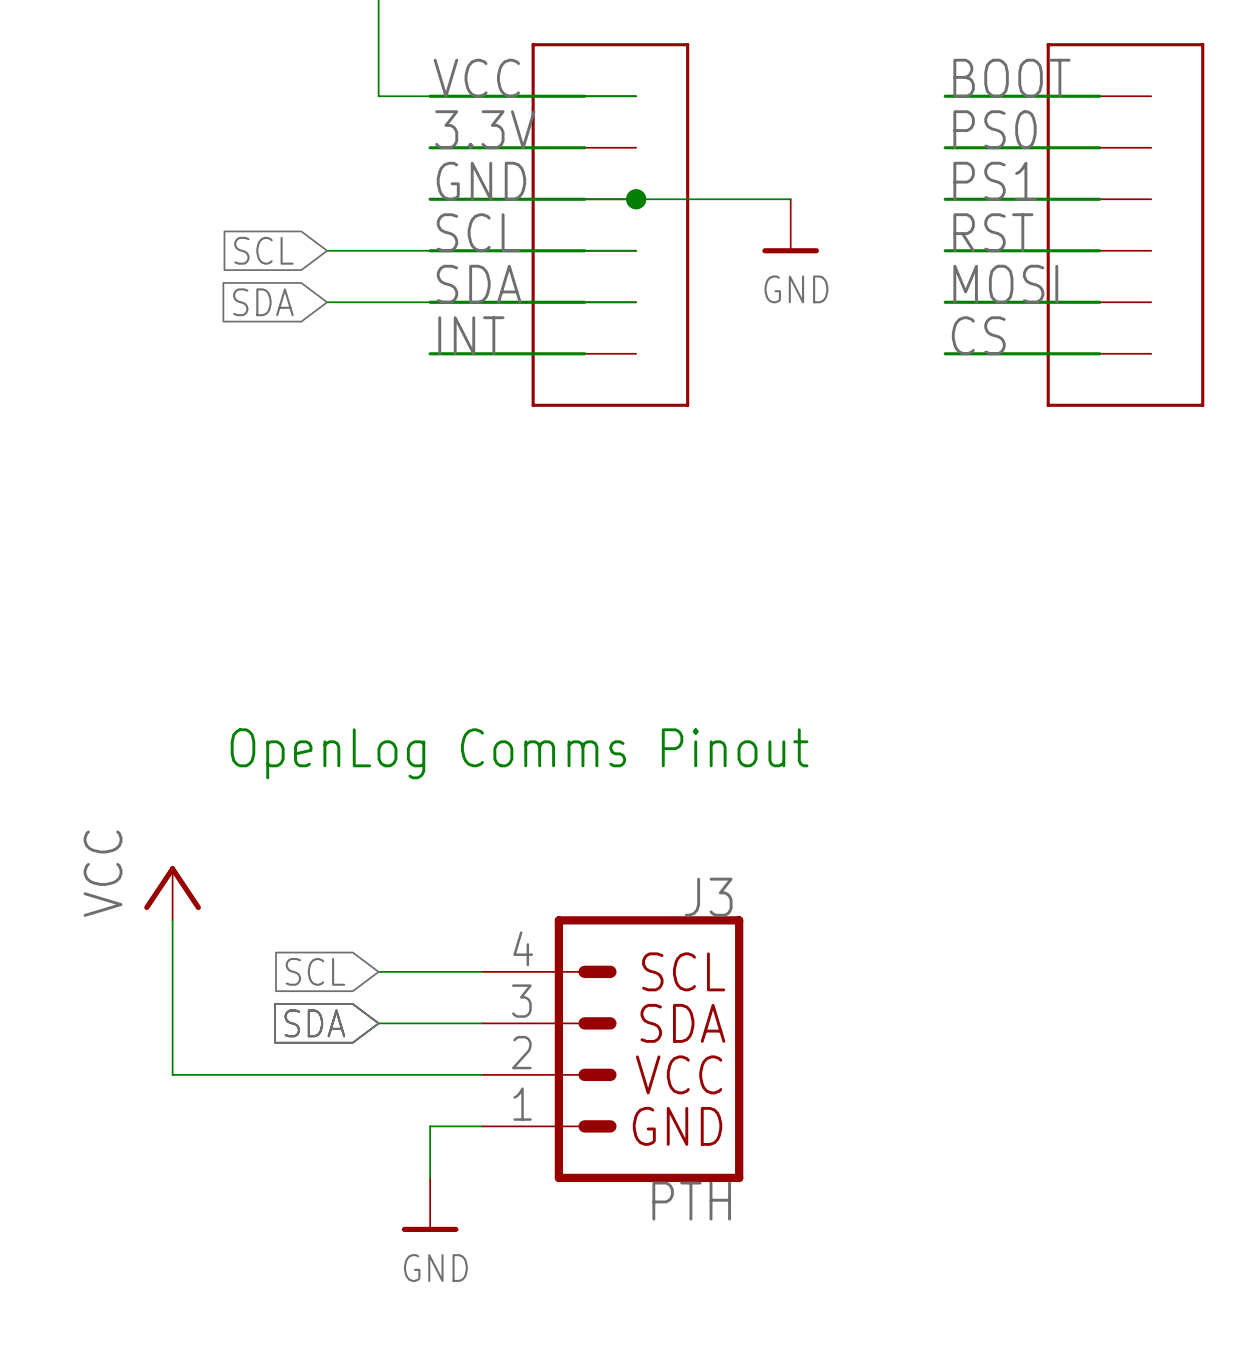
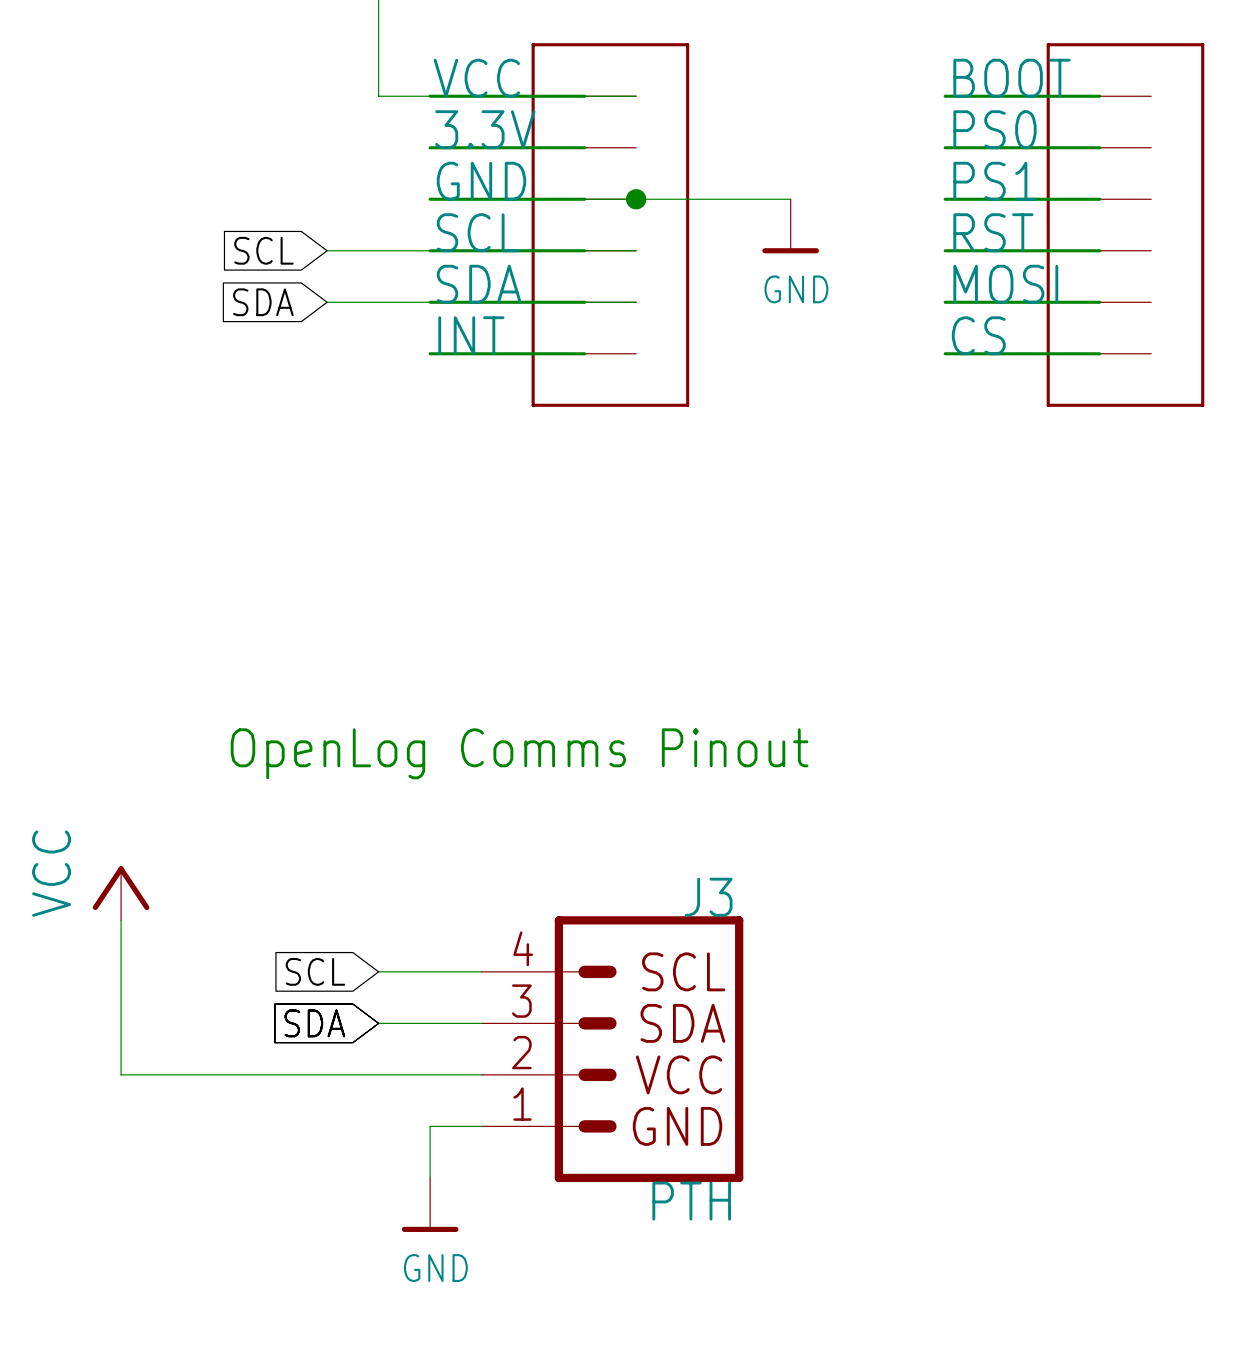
power symbol position: VCC (172, 893) -> VCC (121, 893)
wire: (172, 920) (172, 1074) -> (121, 920) (121, 1074) (172, 1074)

